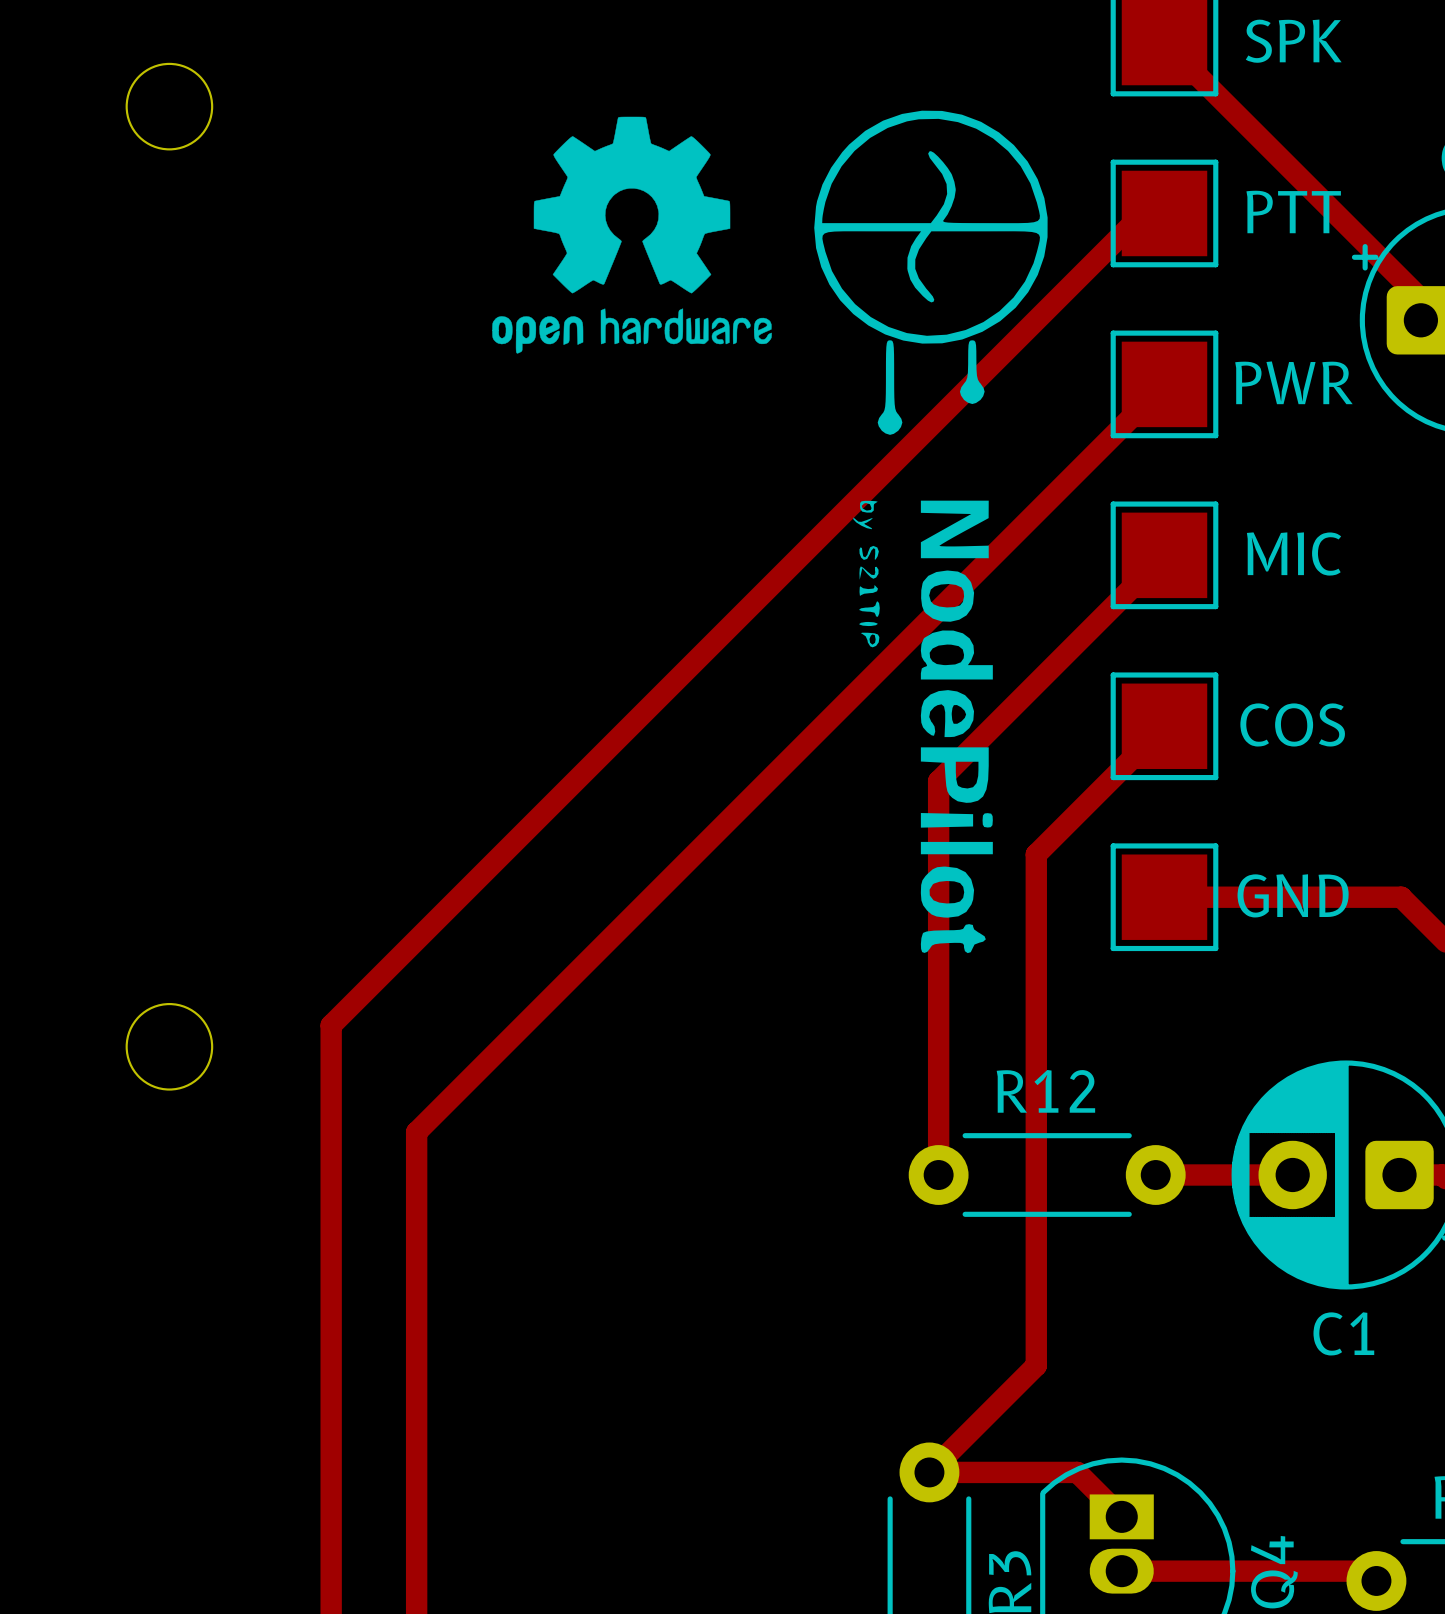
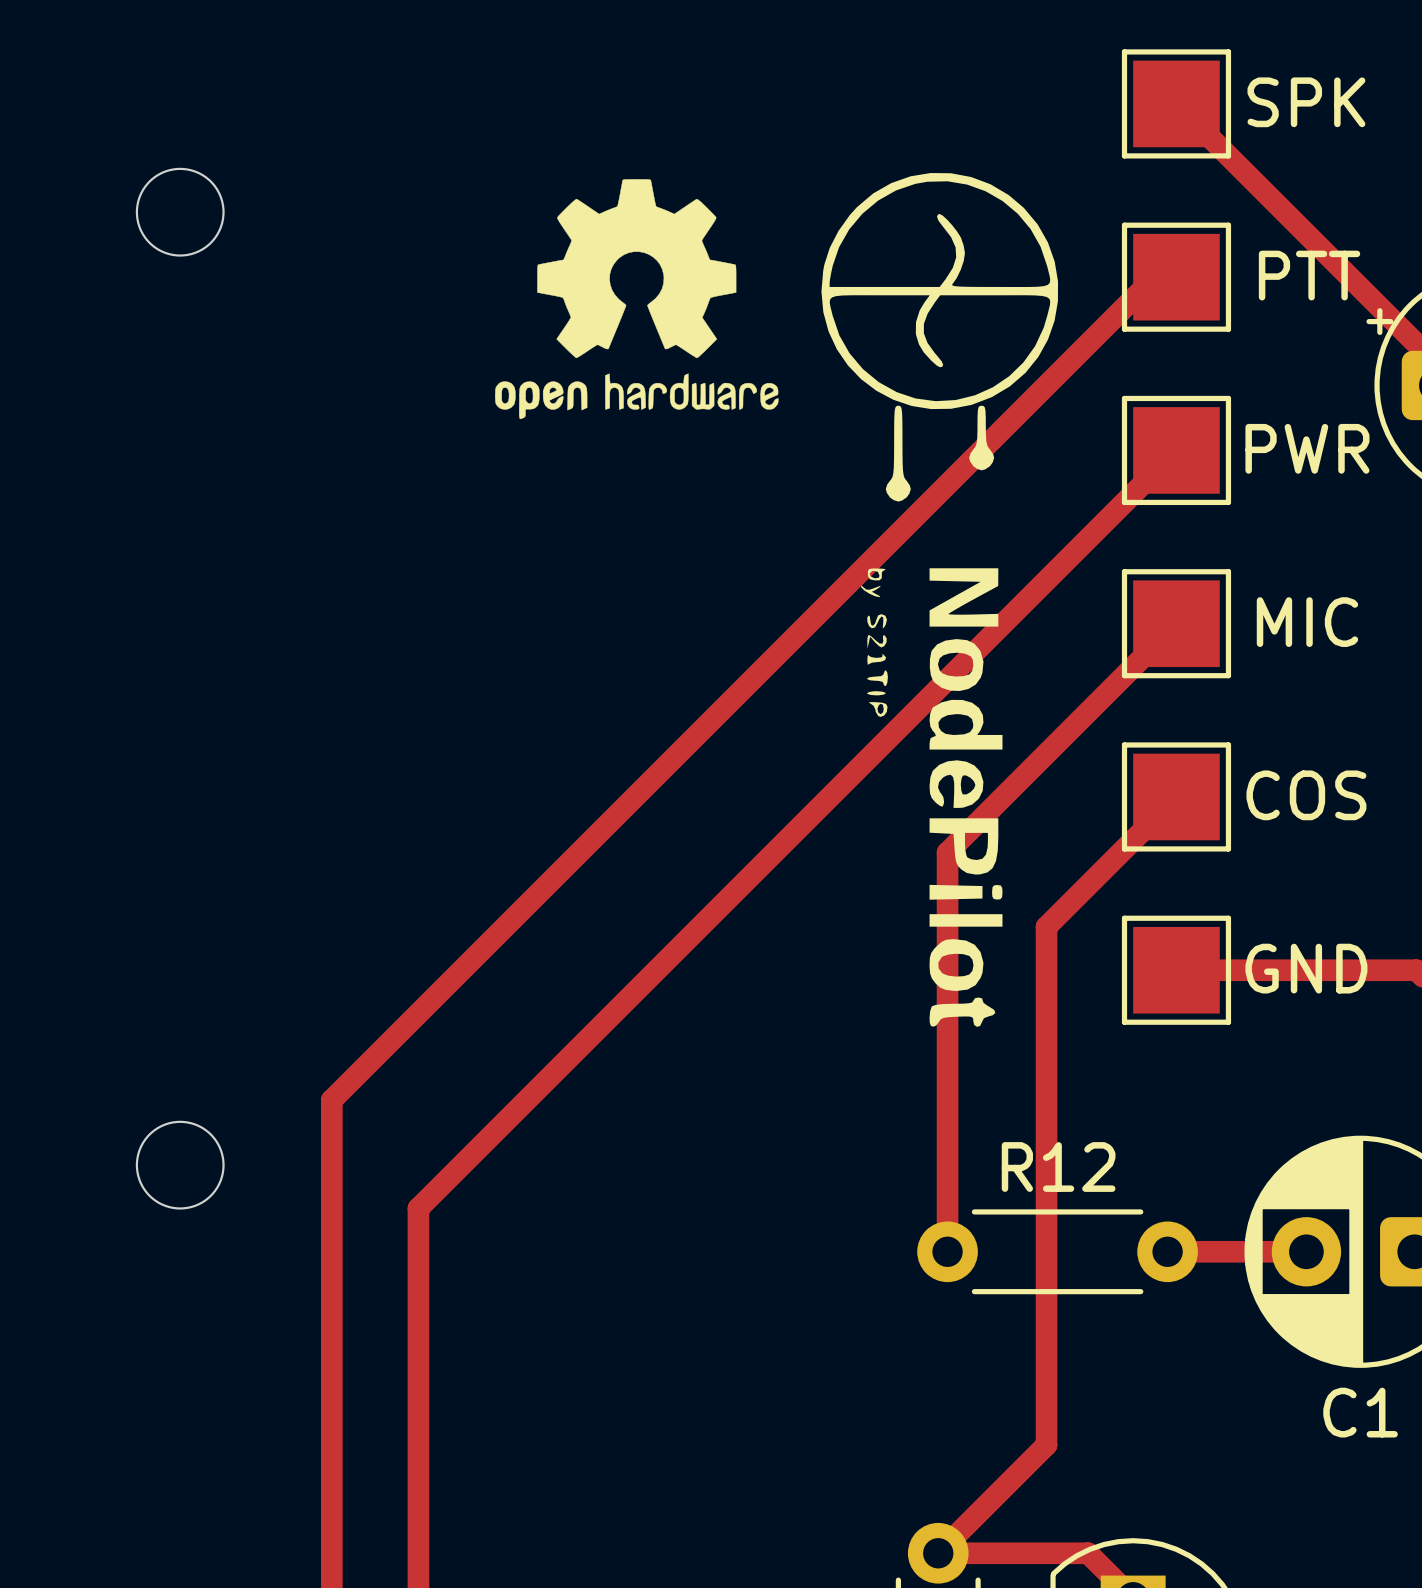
round board edge position: (169, 106) -> (180, 212)
round board edge position: (169, 1046) -> (180, 1165)

